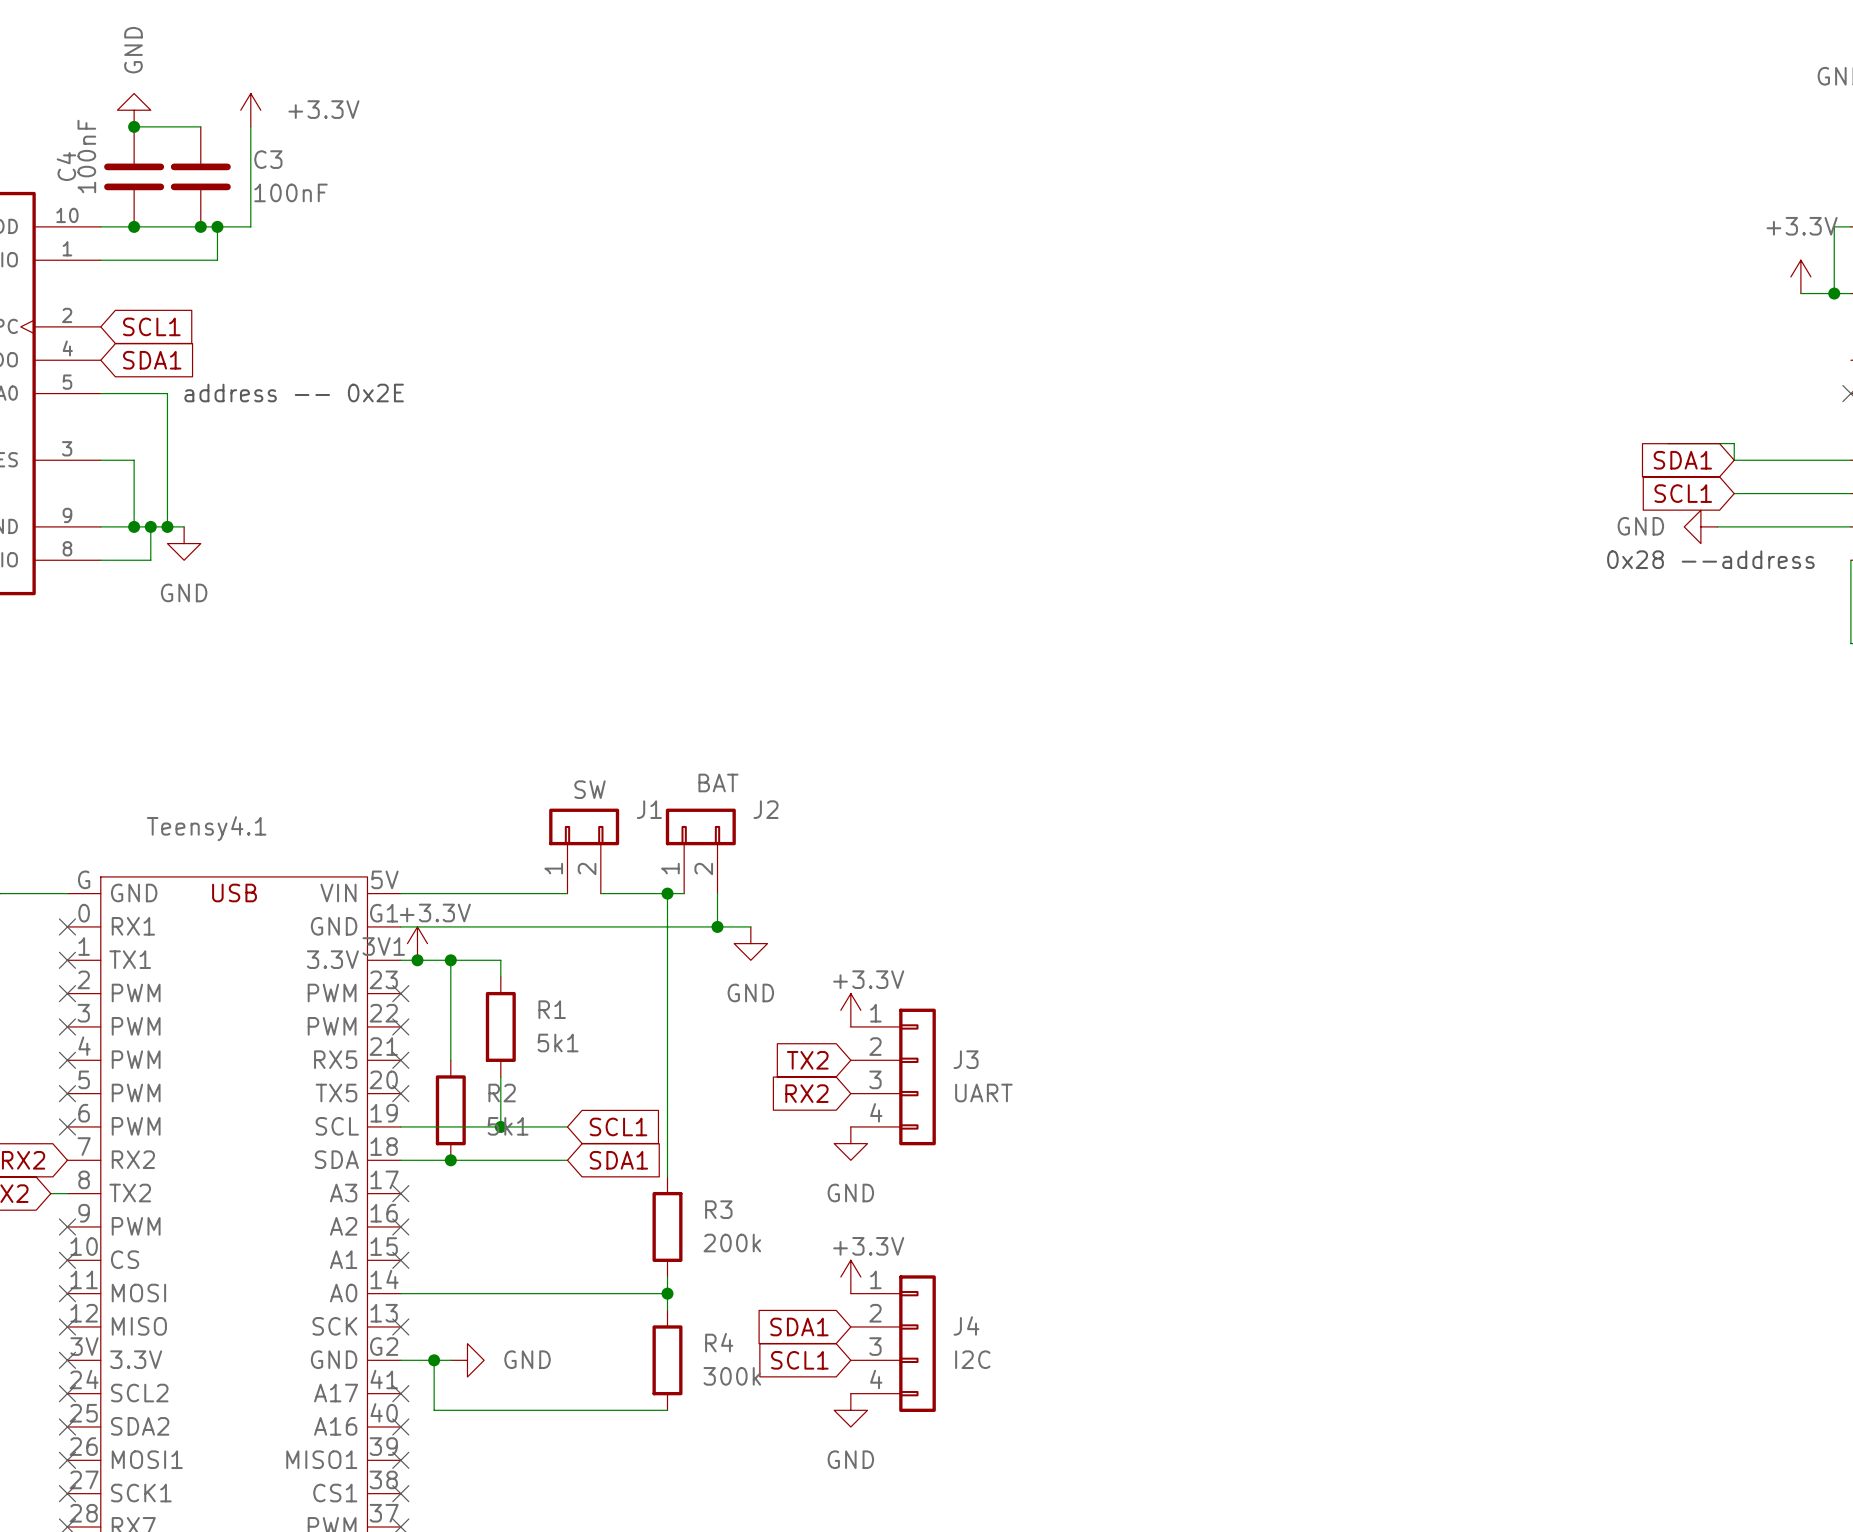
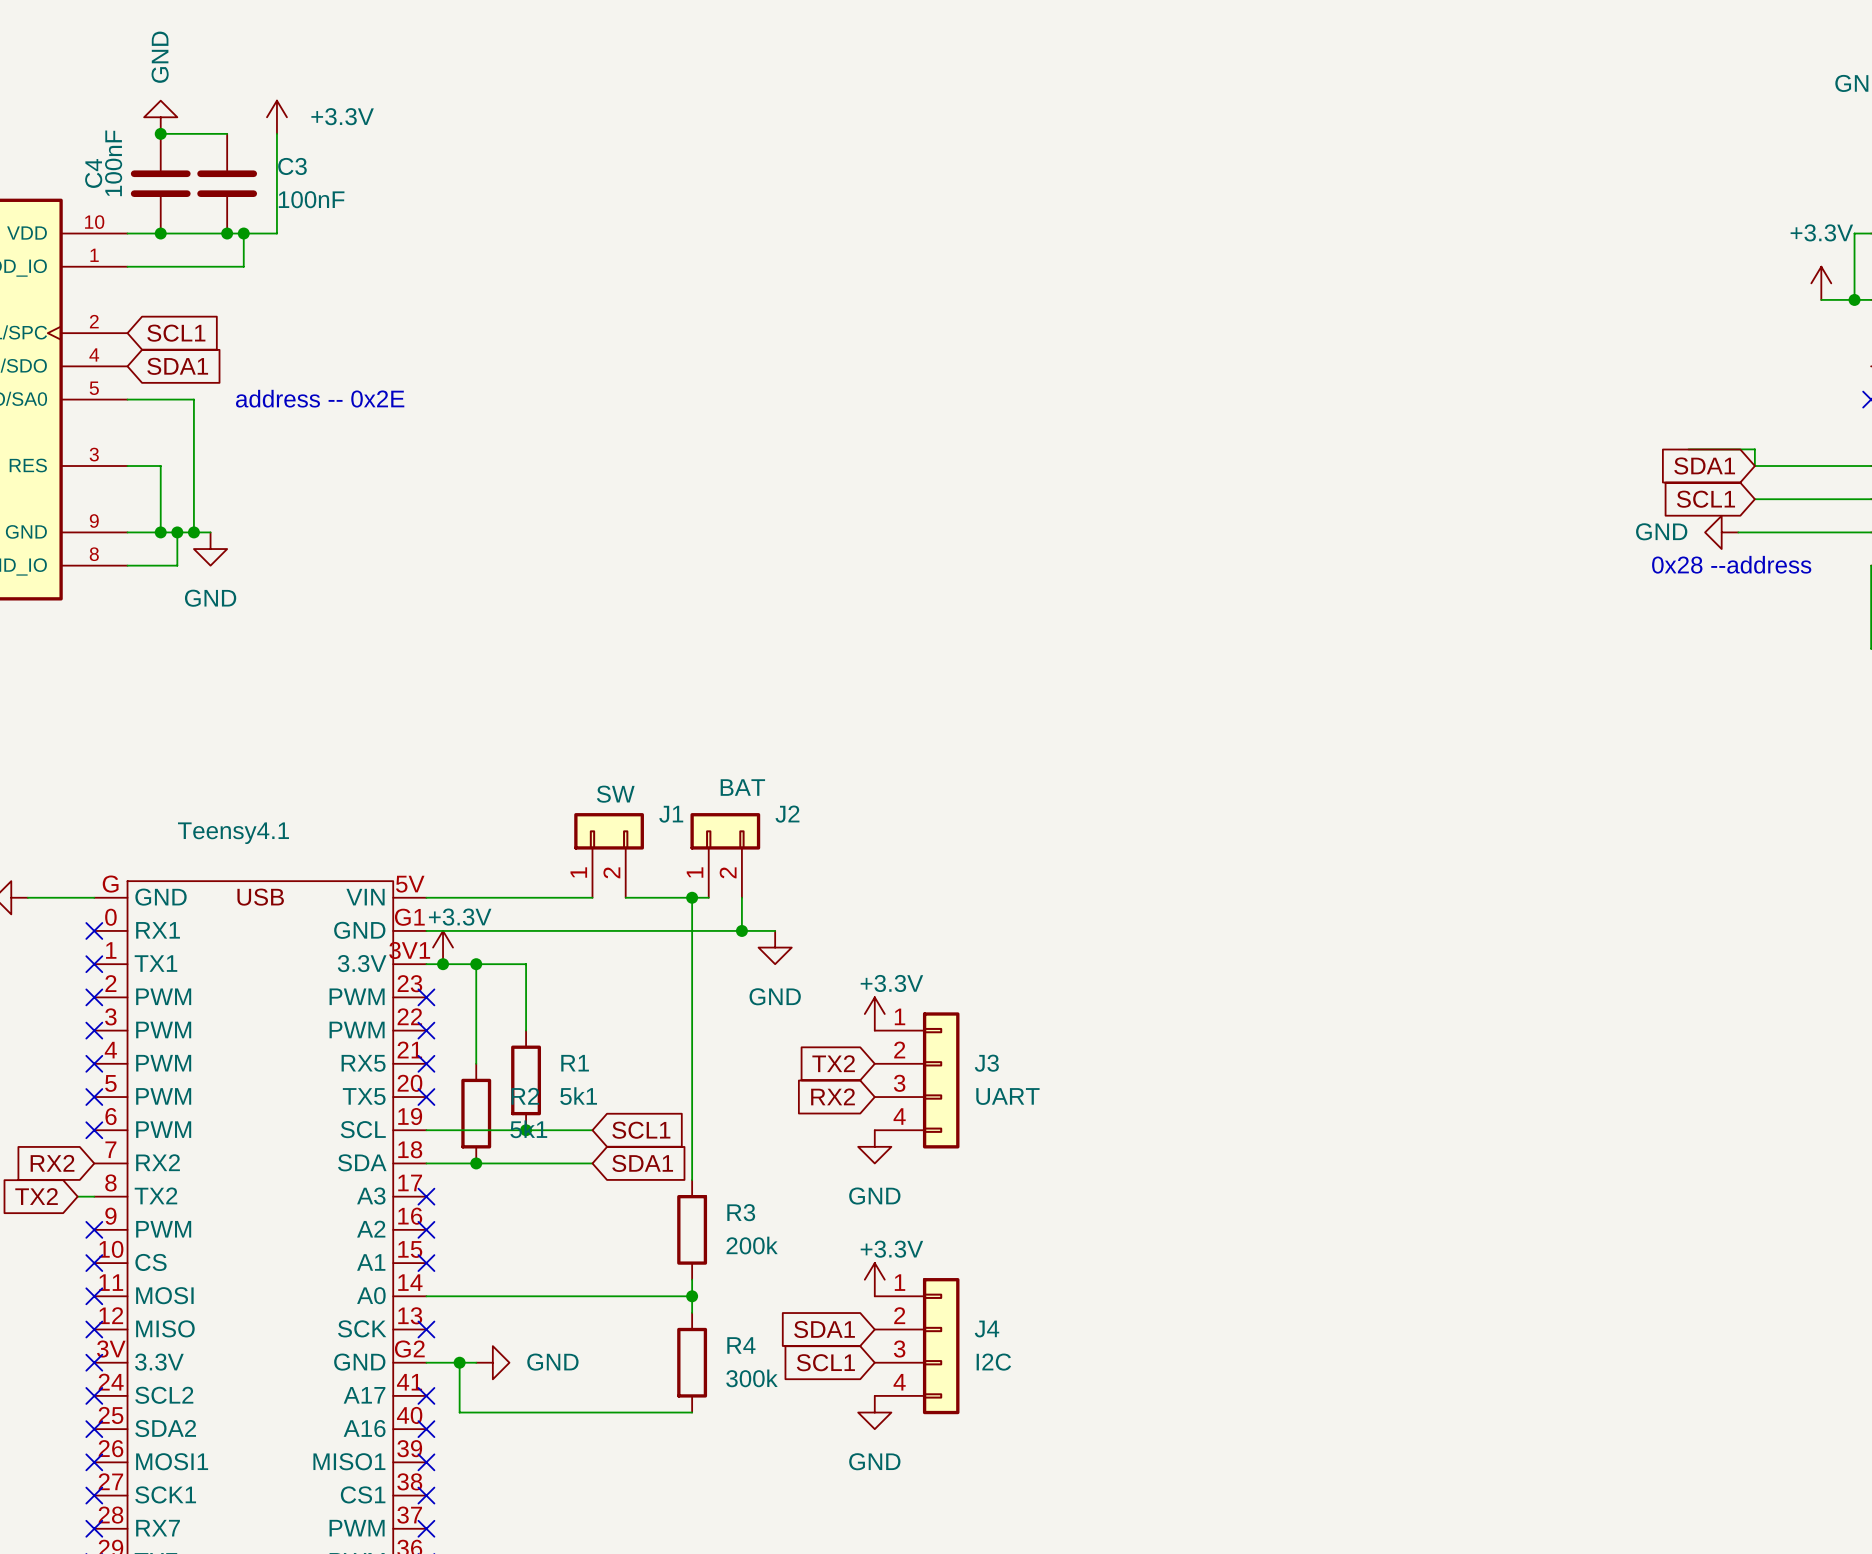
R1 position: (500, 1026) -> (526, 1080)
wire: (500, 1076) (500, 1126) -> (526, 980) (526, 1030)

